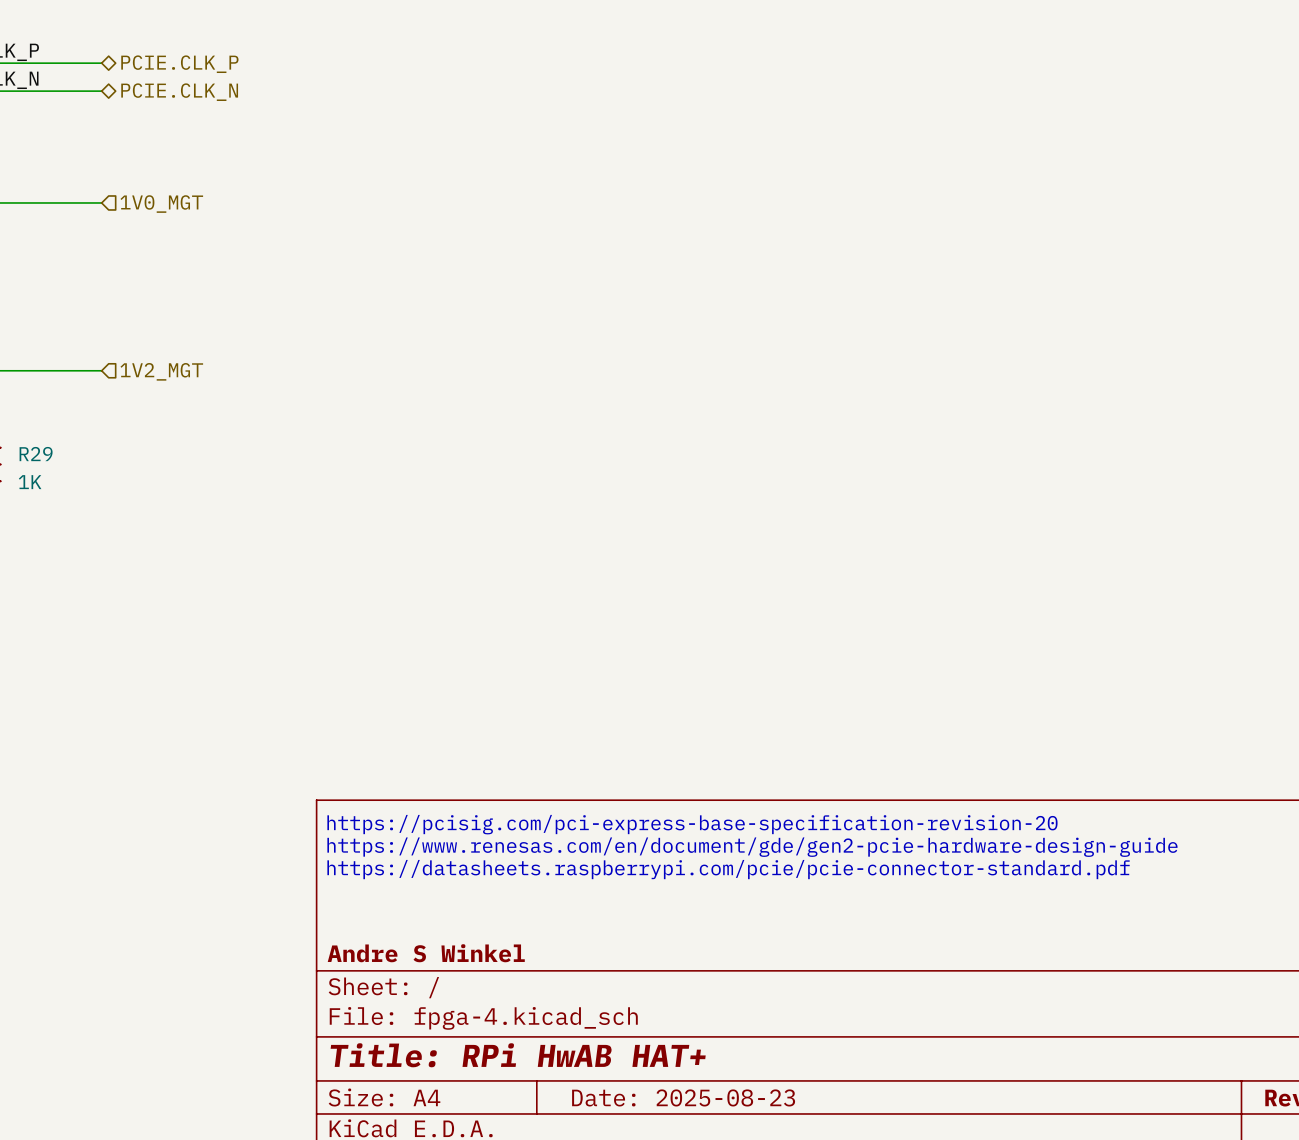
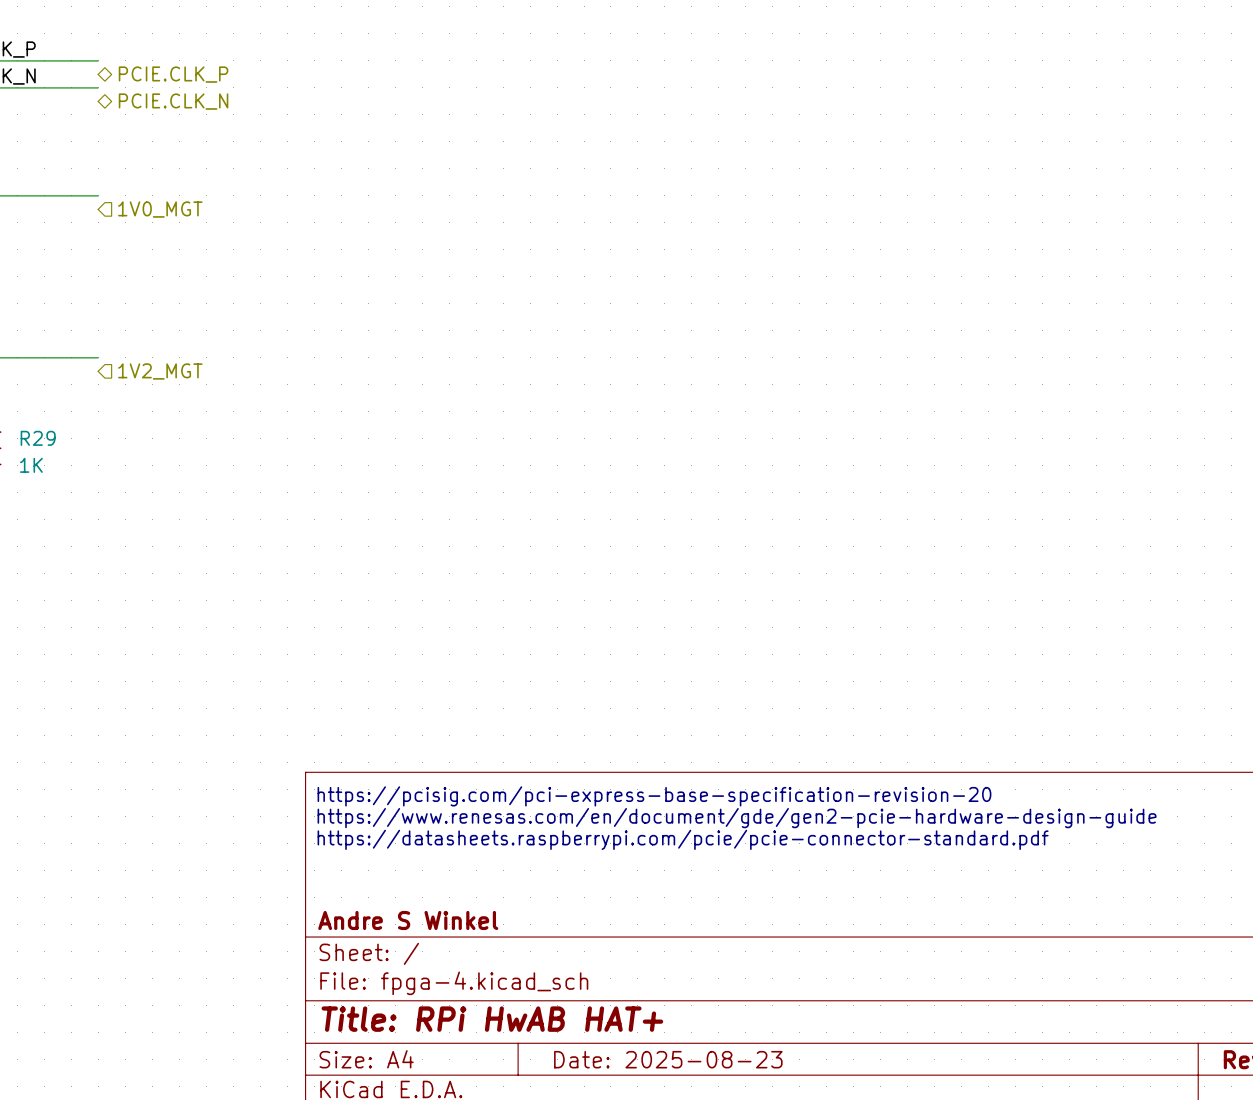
hierarchical label position: PCIE.CLK_P (179, 64) -> PCIE.CLK_P (173, 74)
hierarchical label position: PCIE.CLK_N (179, 92) -> PCIE.CLK_N (173, 101)
hierarchical label position: 1V0_MGT (161, 204) -> 1V0_MGT (160, 209)
hierarchical label position: 1V2_MGT (161, 371) -> 1V2_MGT (160, 371)

